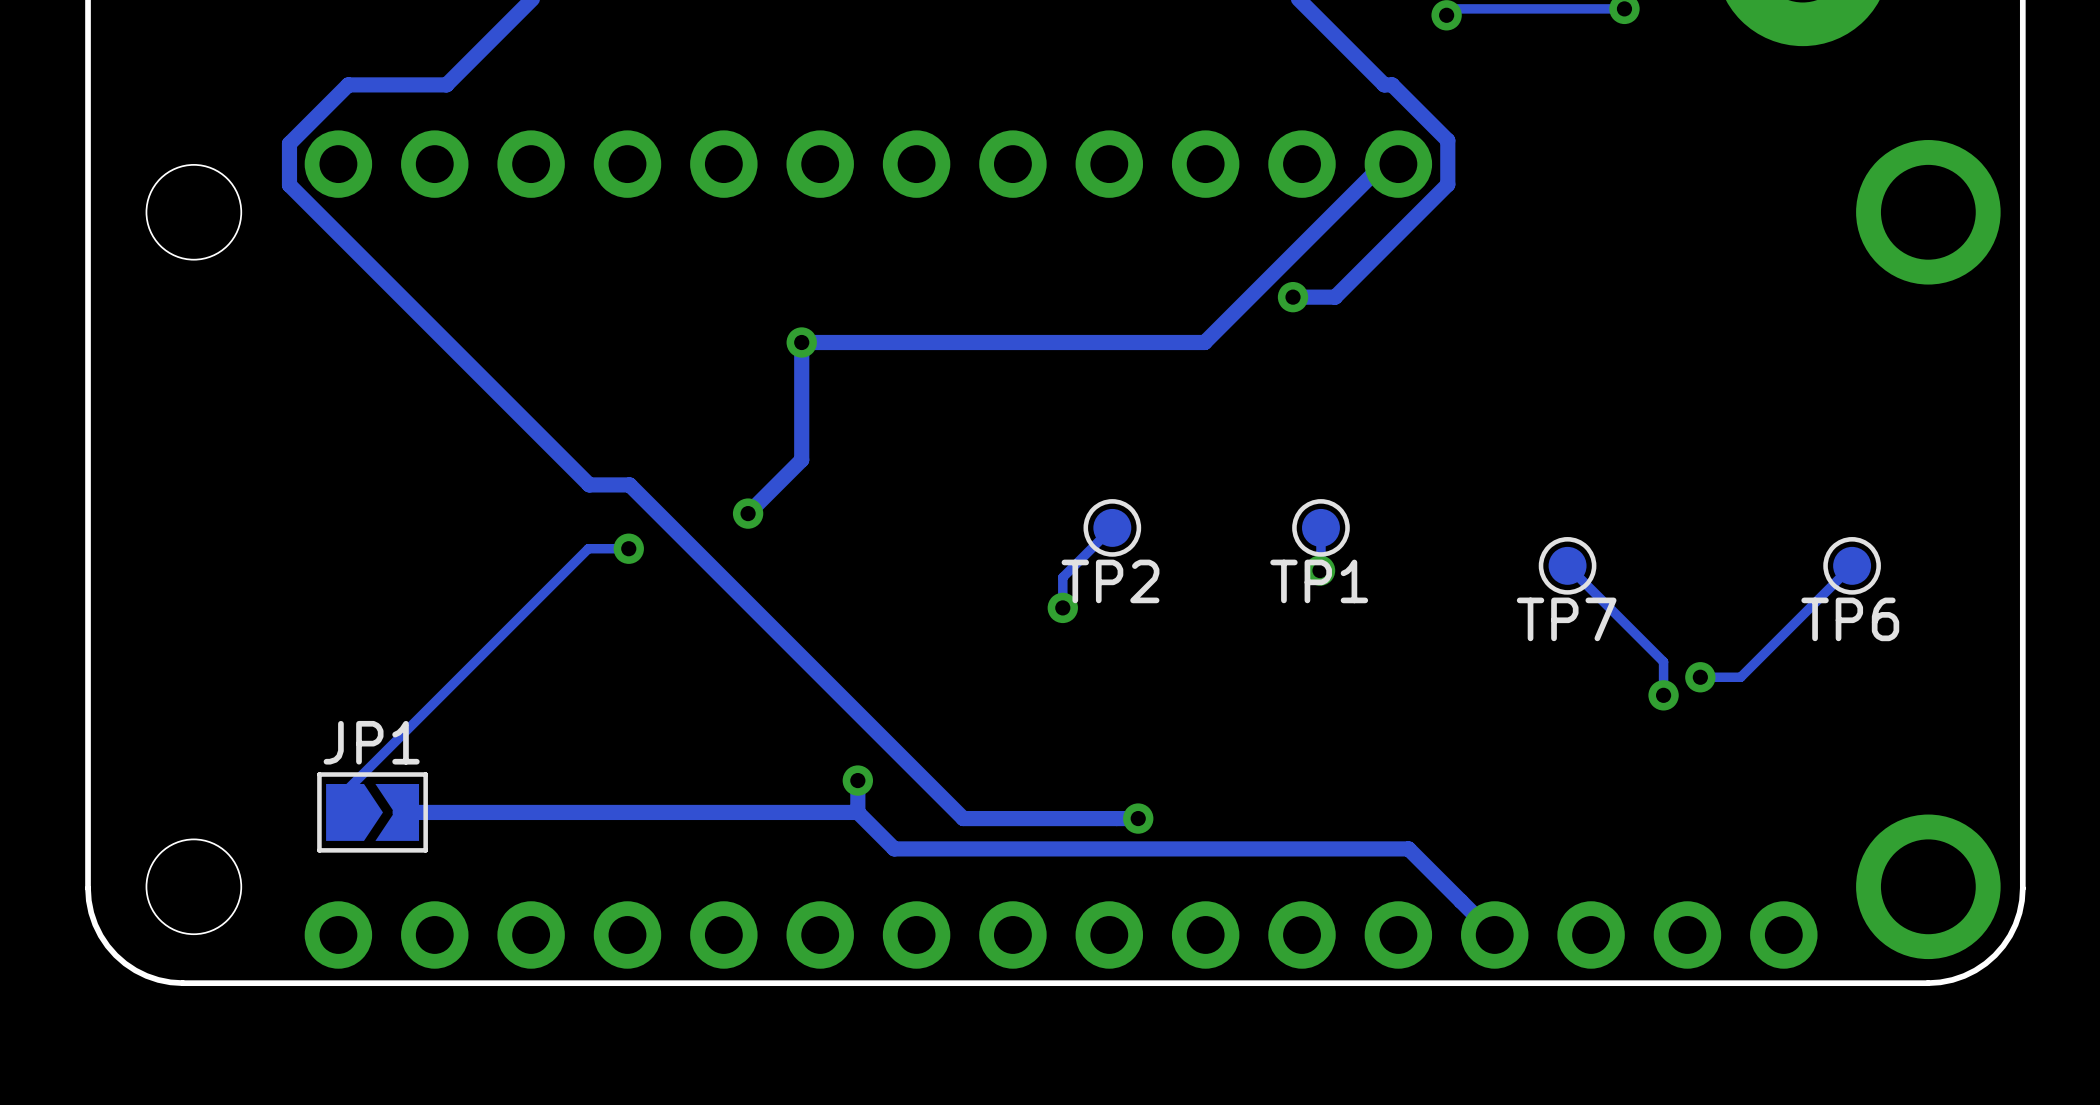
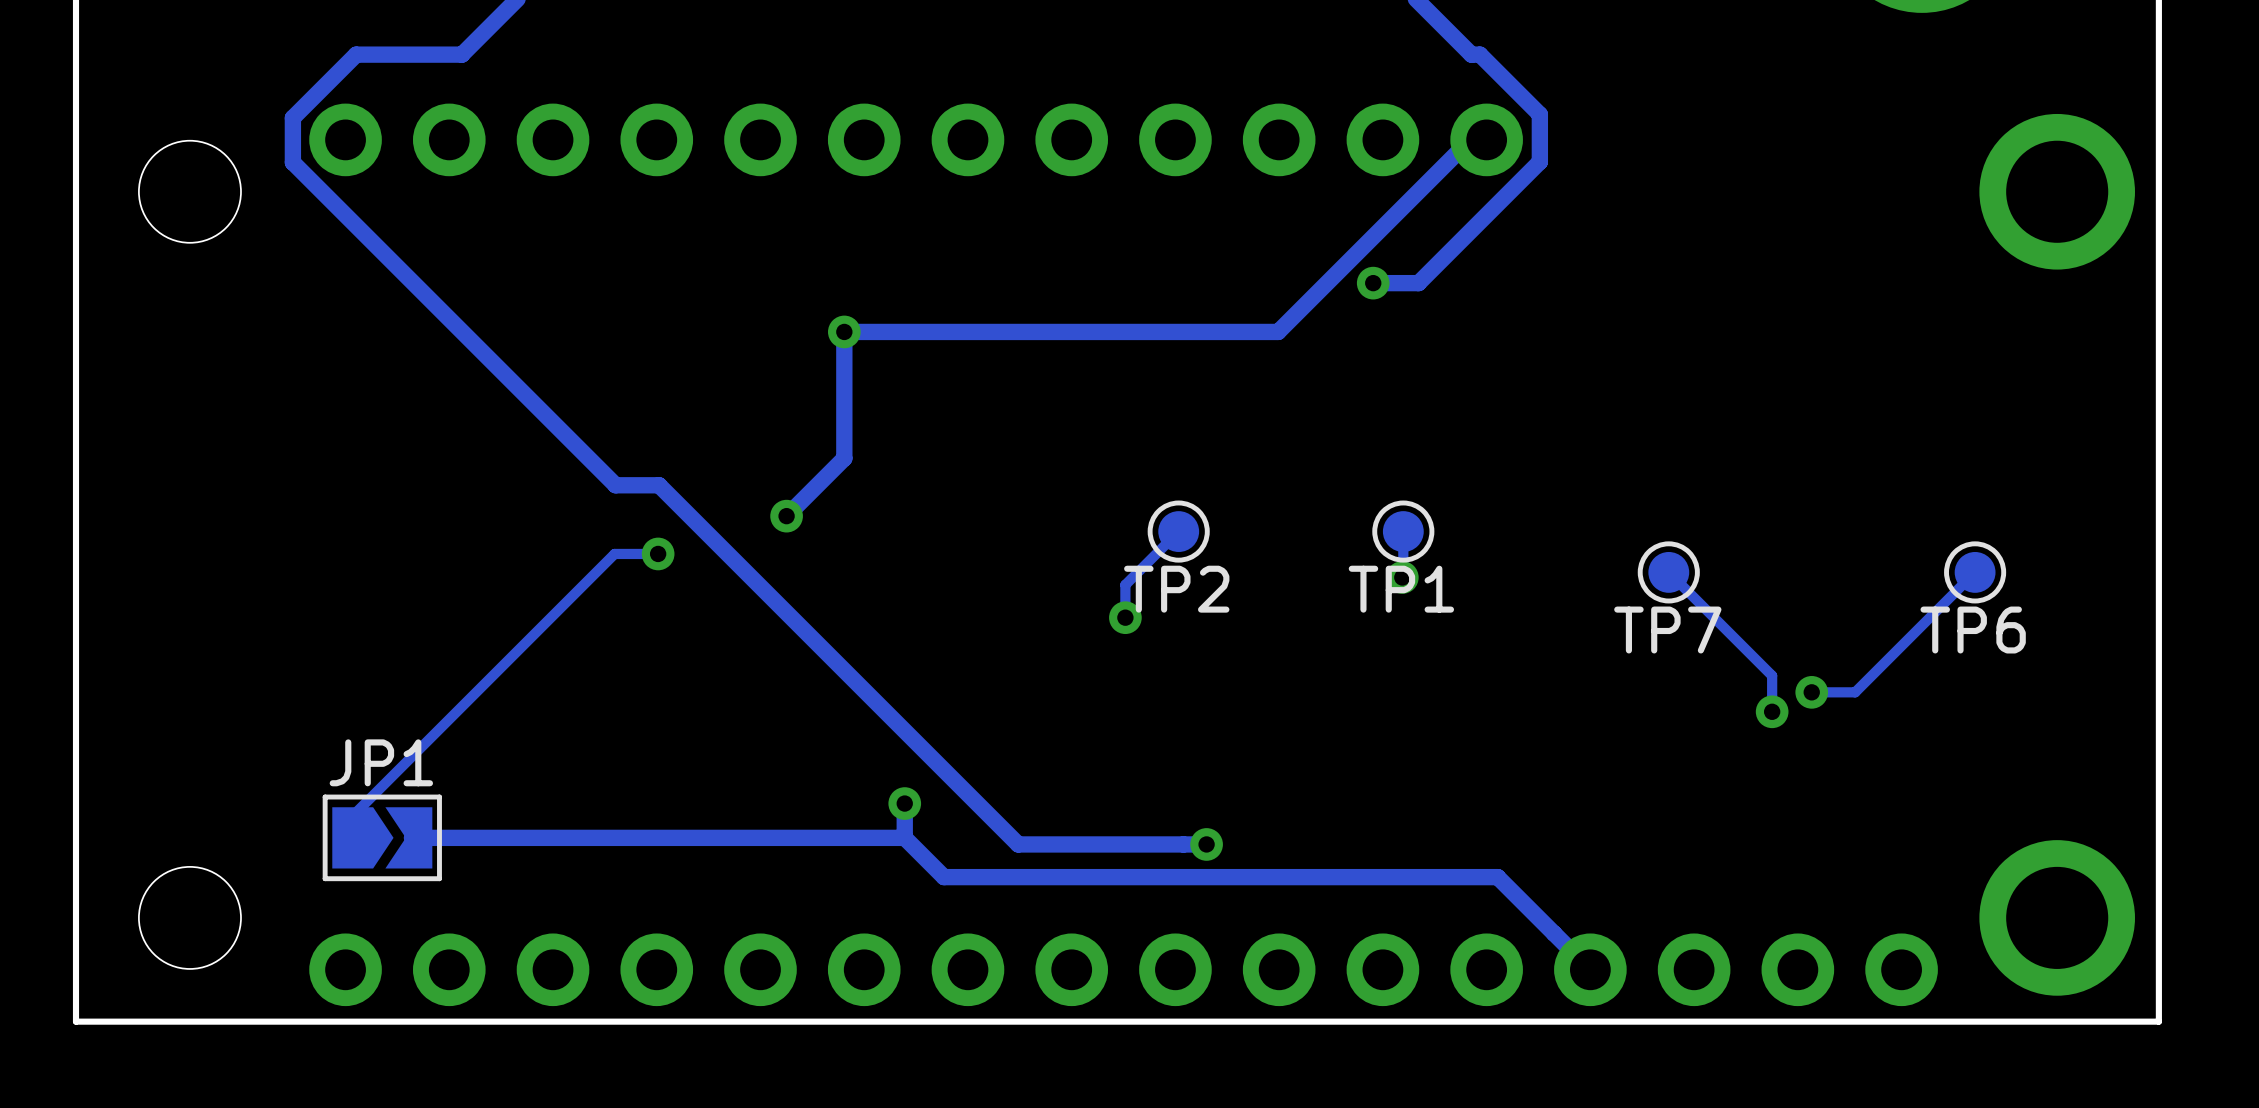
board edge: (88, 888) (88, 900) (95, 924) (100, 935) (115, 955) (135, 970) (146, 975) (170, 982) (182, 983) -> (76, 919) (76, 1021) (178, 1021)
board edge: (2022, 888) (2022, 900) (2015, 924) (2003, 946) (1995, 955) (1975, 970) (1964, 975) (1940, 982) (1927, 983) -> (2158, 919) (2158, 1021) (2056, 1021)

